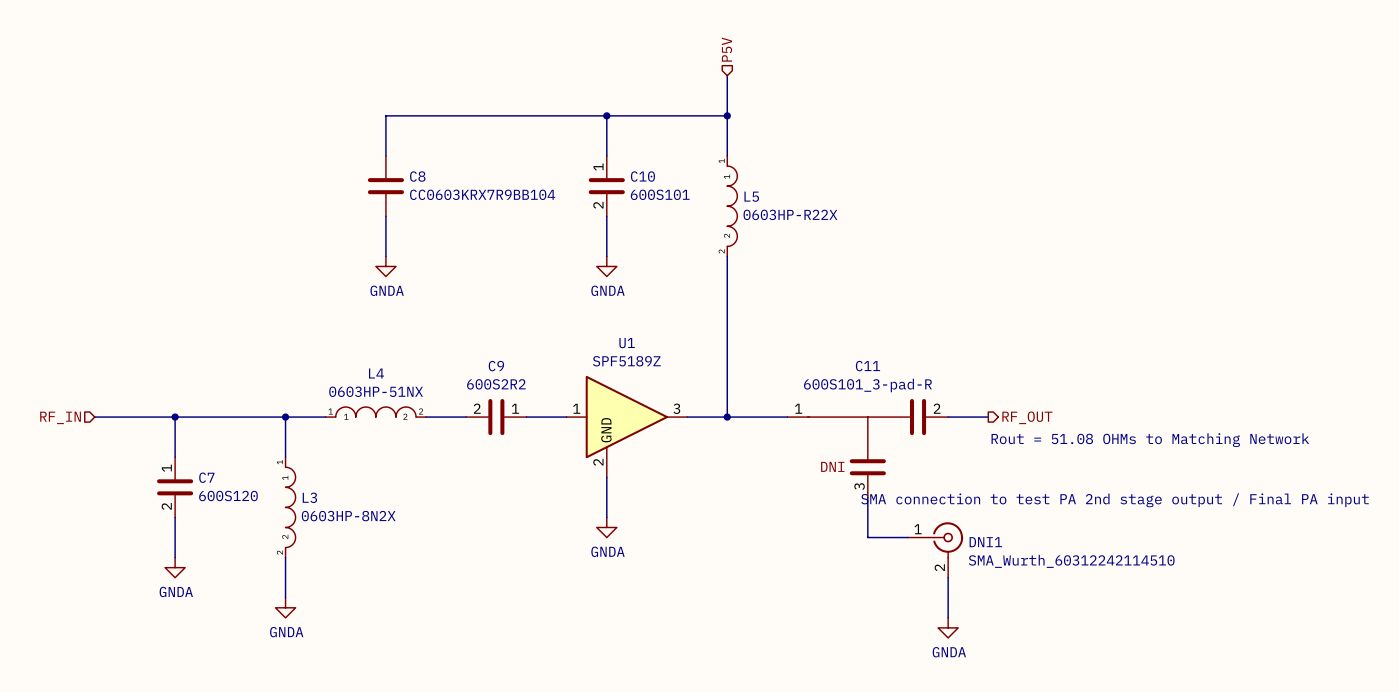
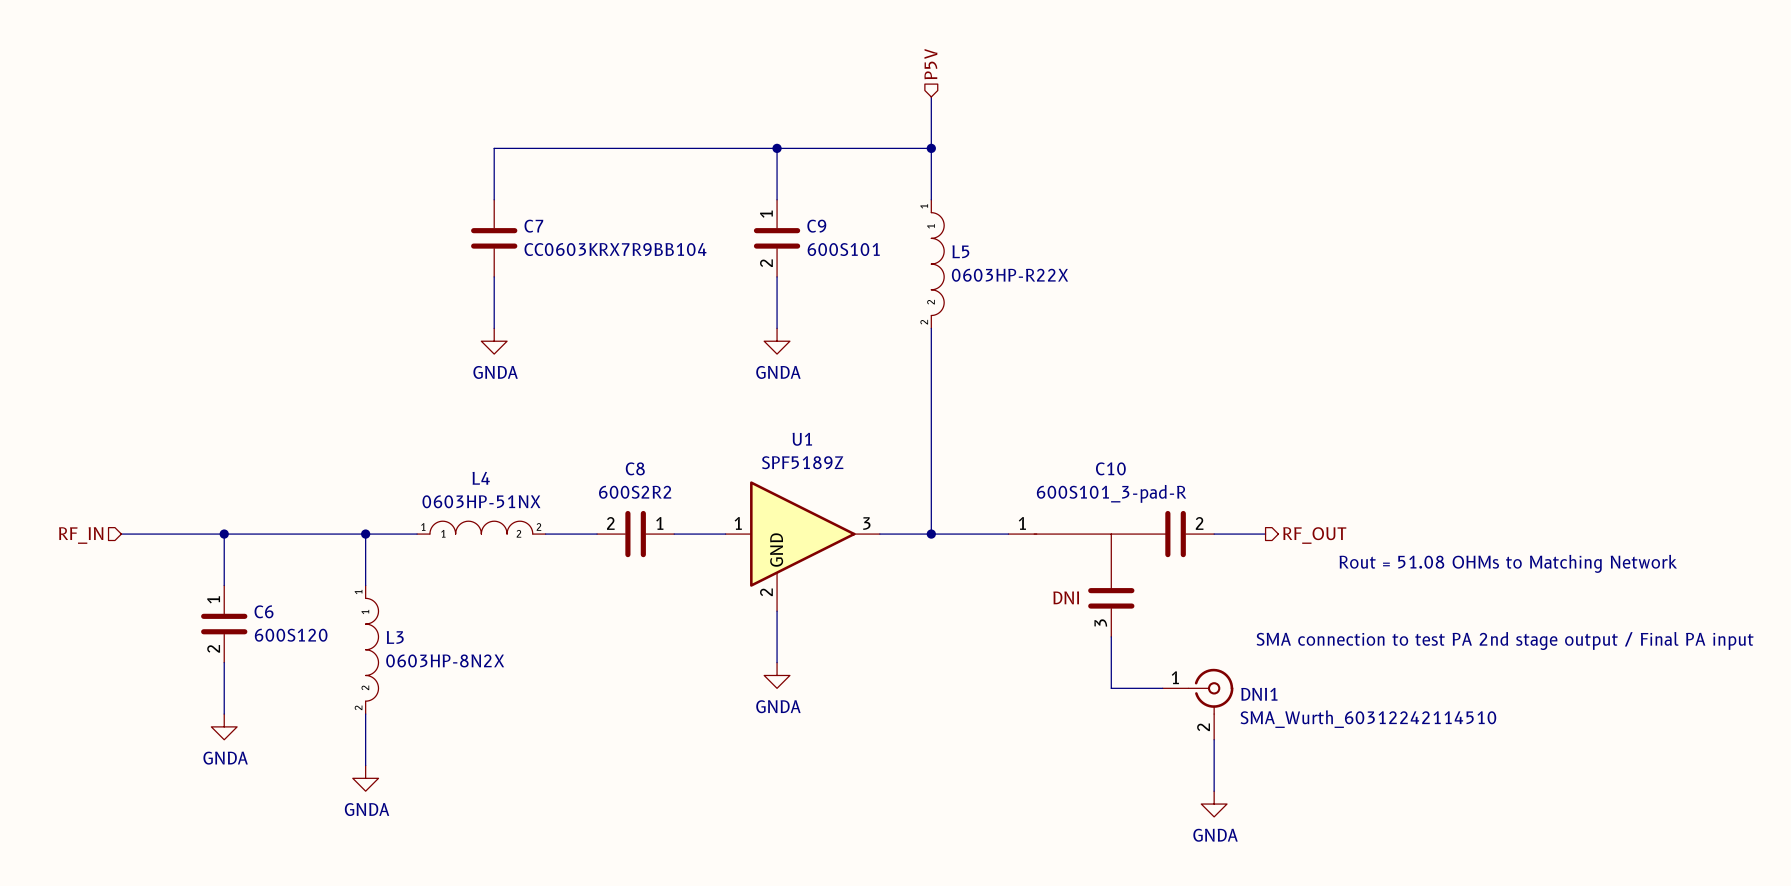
C8 name: C8 (417, 176) -> C7 (533, 226)
C10 name: C10 (642, 176) -> C9 (816, 226)
C9 name: C9 (496, 366) -> C8 (635, 468)
C11 name: C11 (867, 366) -> C10 (1110, 468)
C7 name: C7 (206, 477) -> C6 (264, 611)

